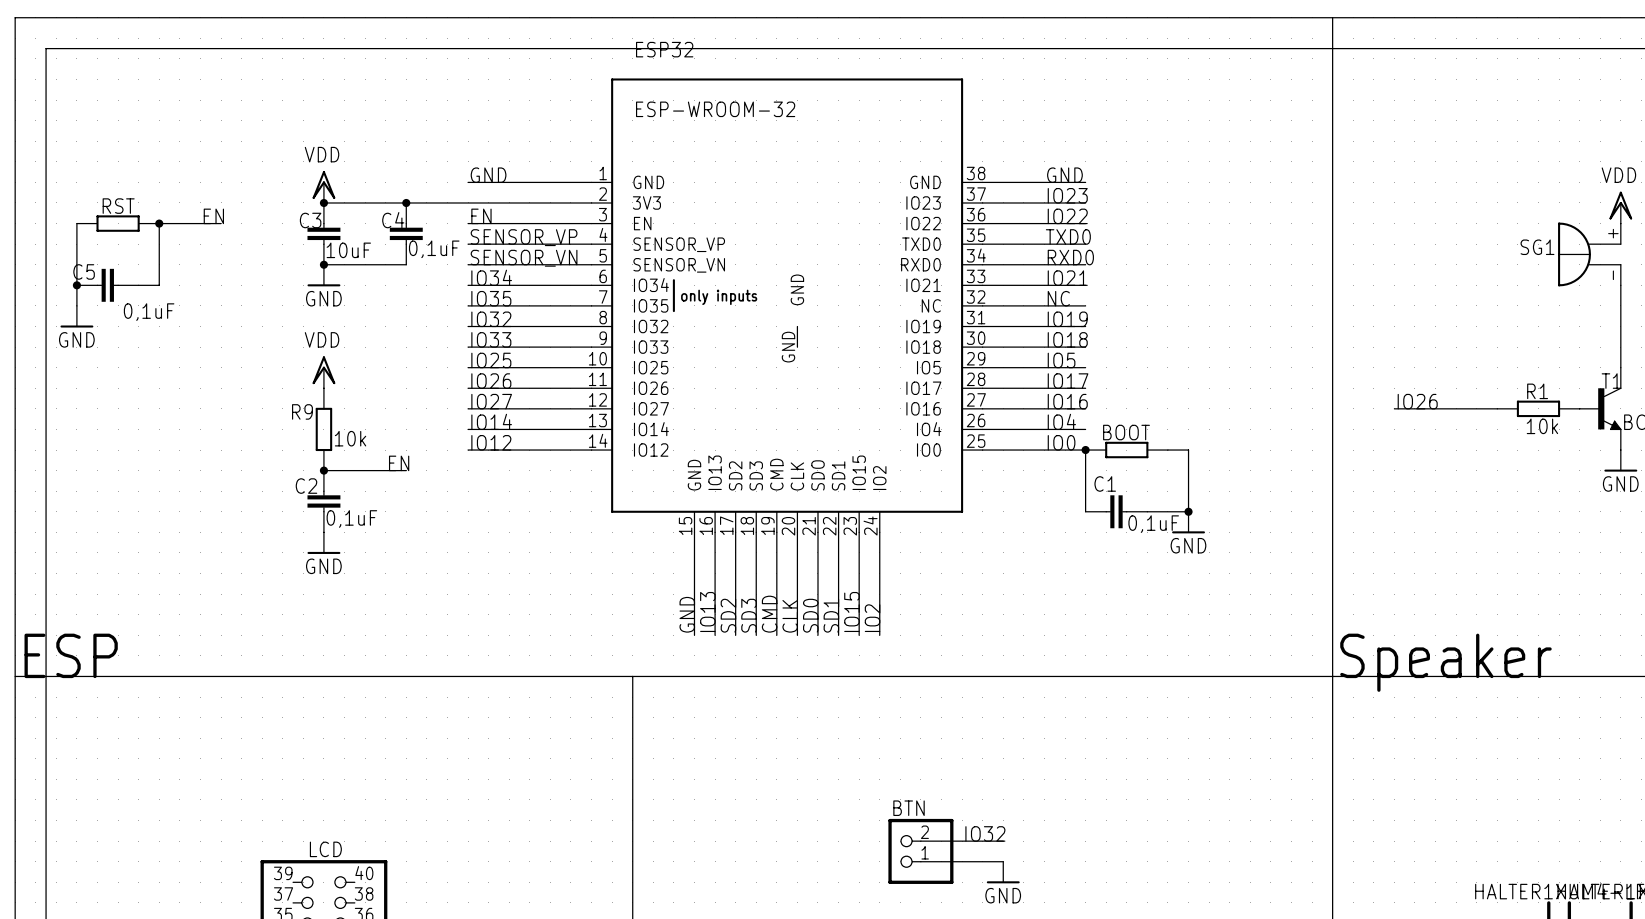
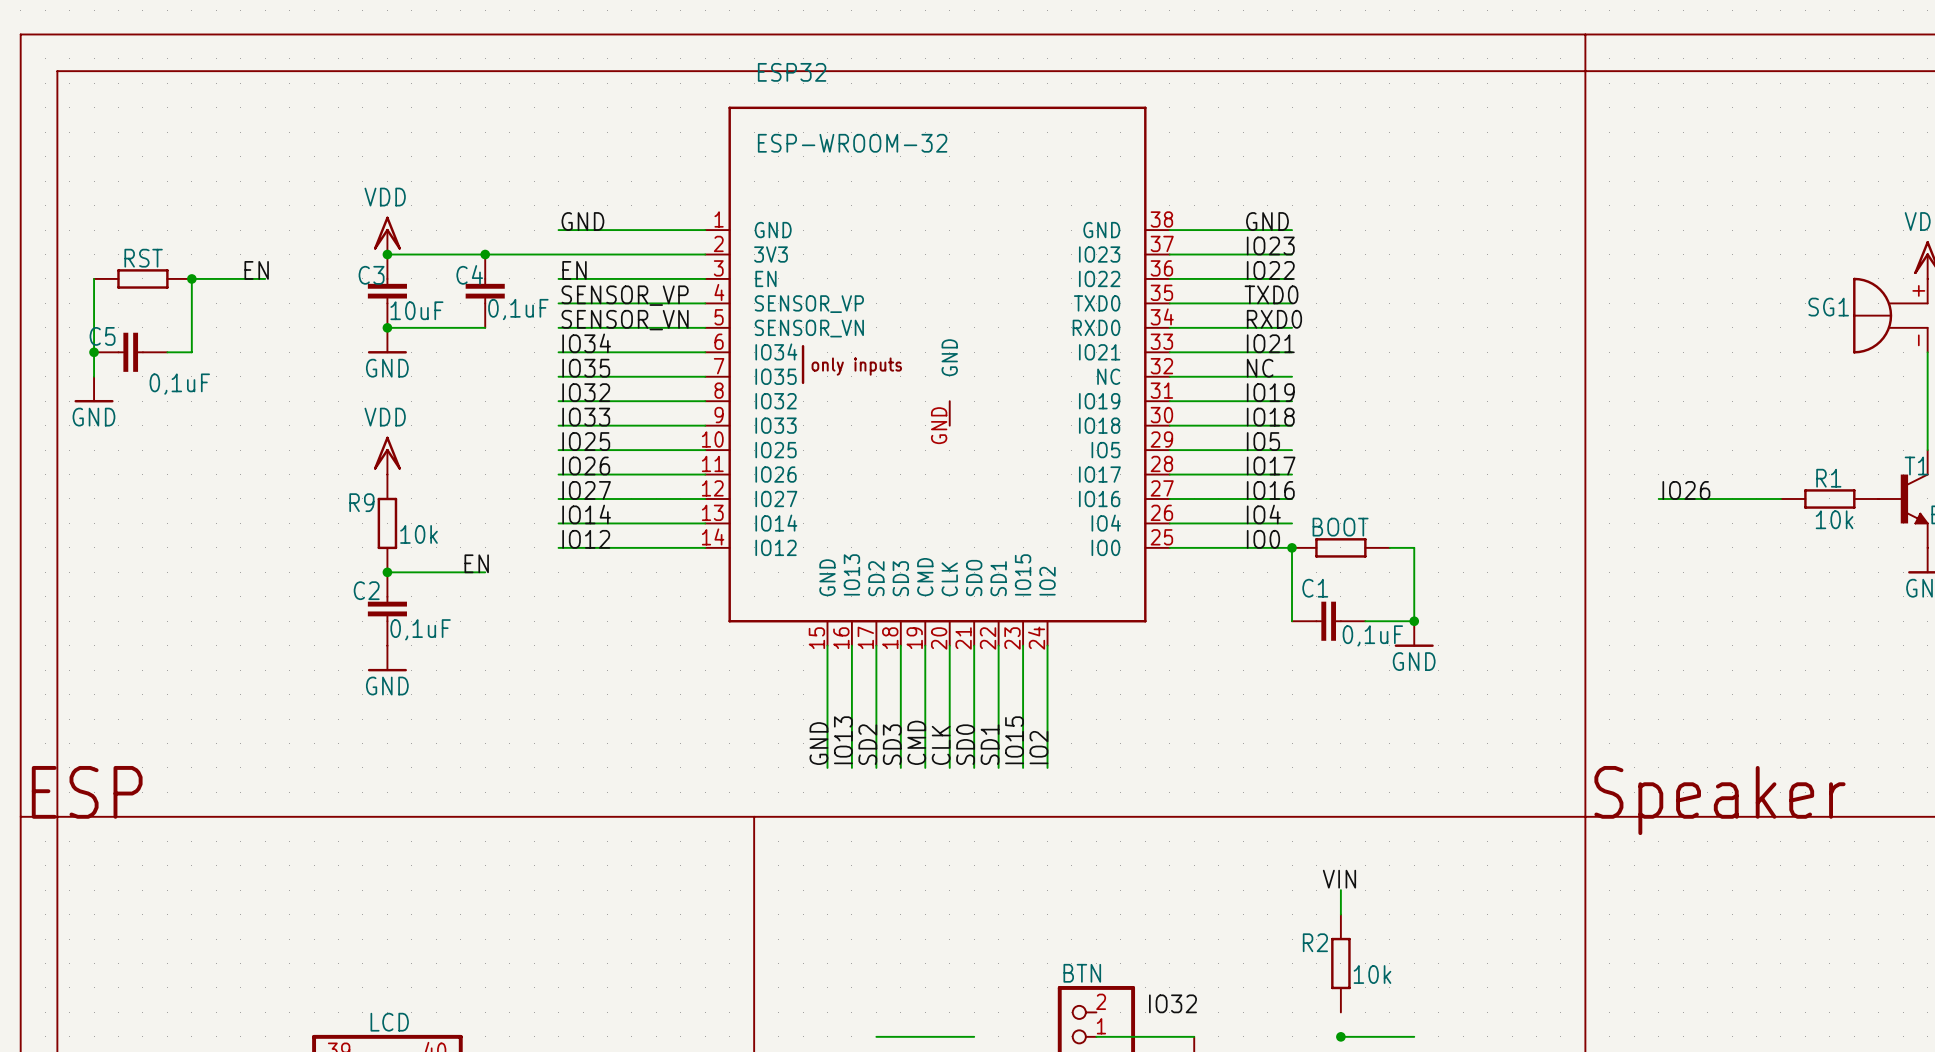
label: none -> VIN (1339, 879)
wire: none -> (1340, 890) (1340, 914)
R2: none -> 10k (1340, 963)
wire: (920, 841) (1003, 841) -> (876, 1036) (974, 1036)
wire: none -> (1340, 1036) (1414, 1036)
junction: none -> (1340, 1036)

